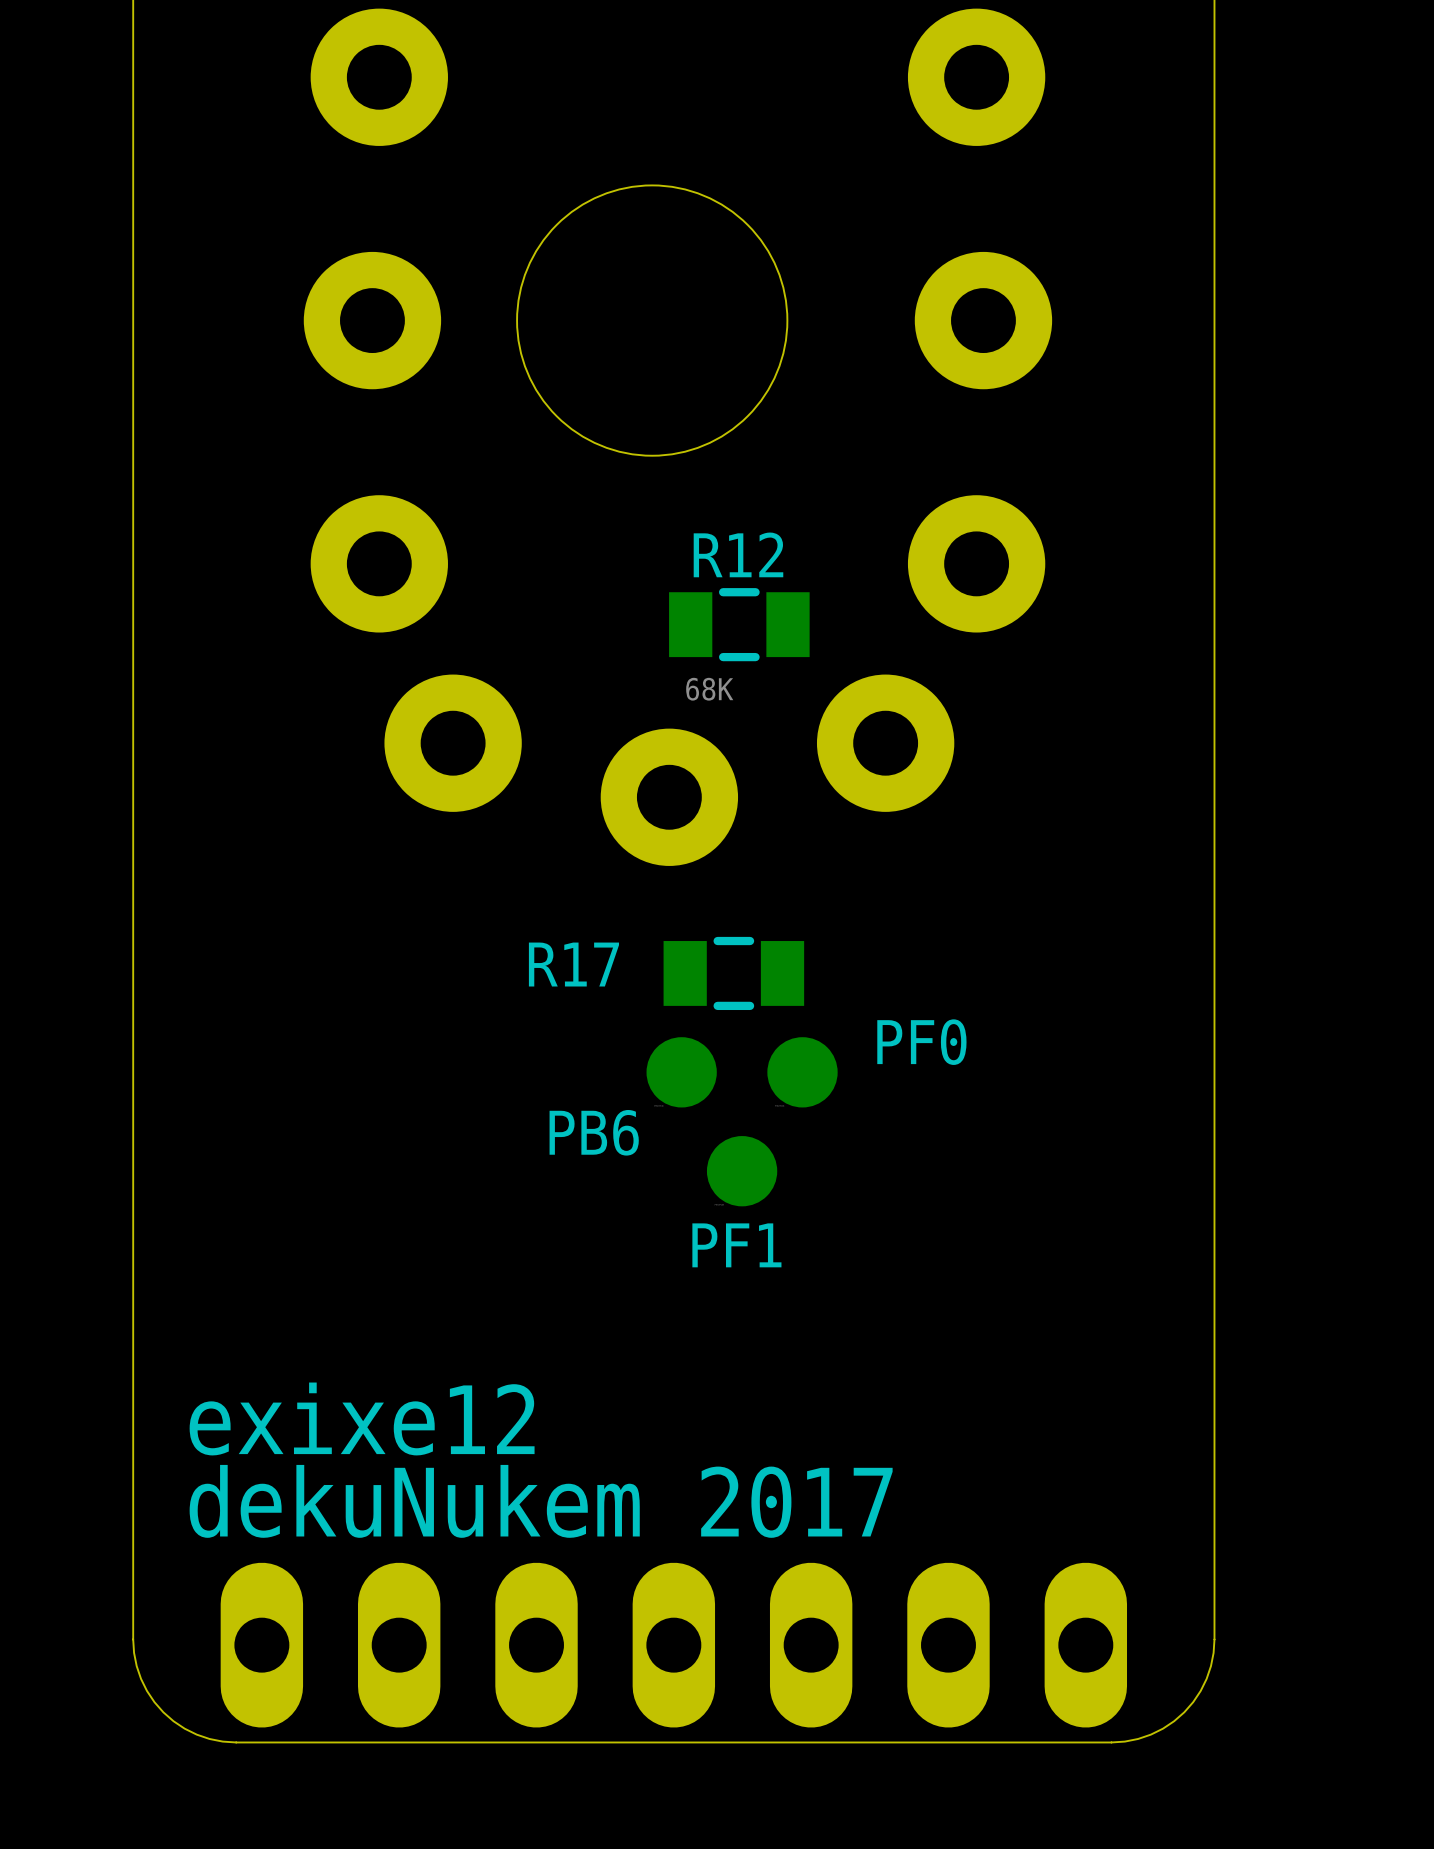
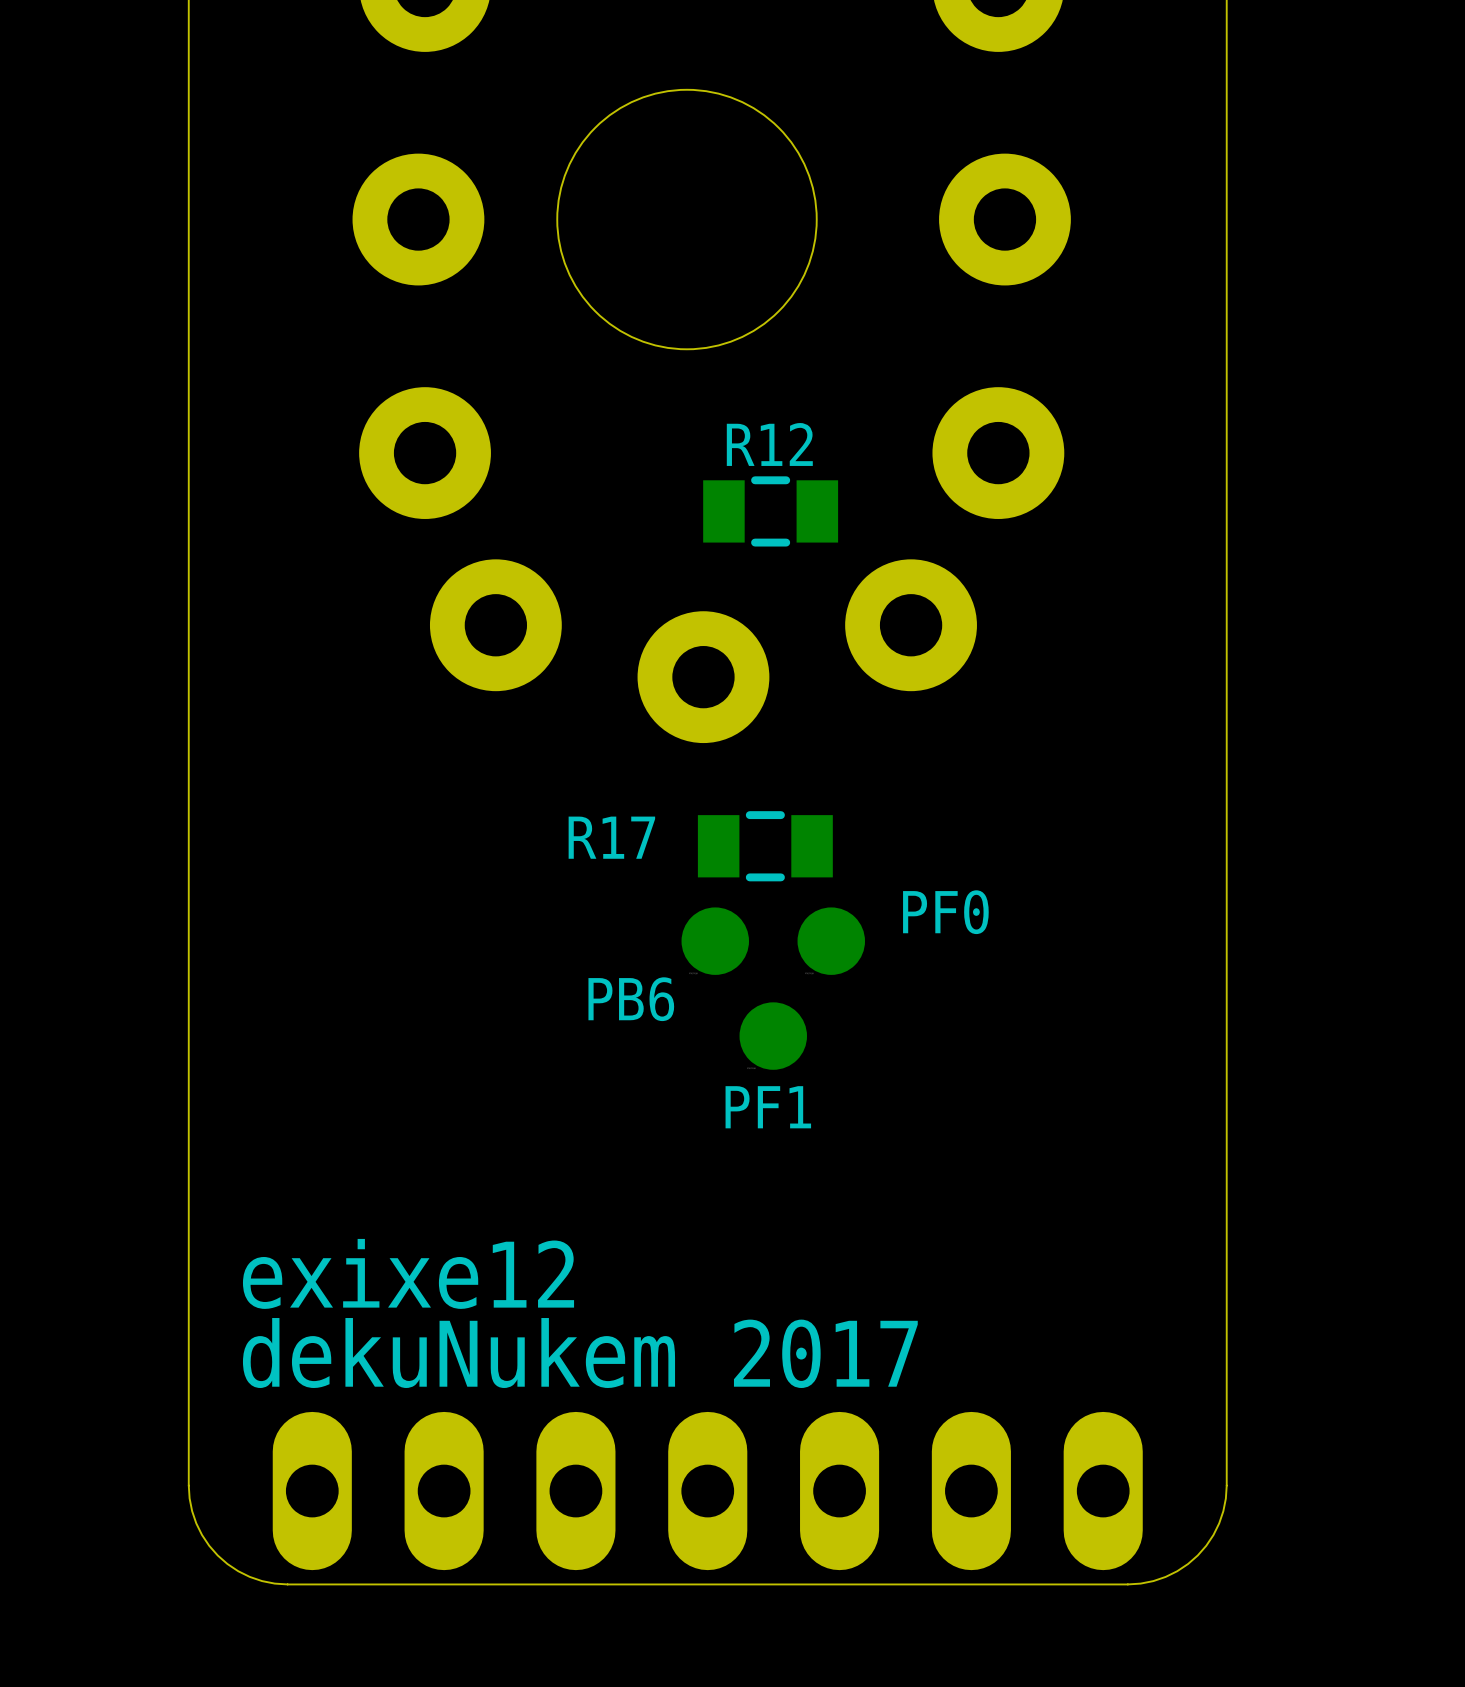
R12 value: 68K (709, 689) -> none

